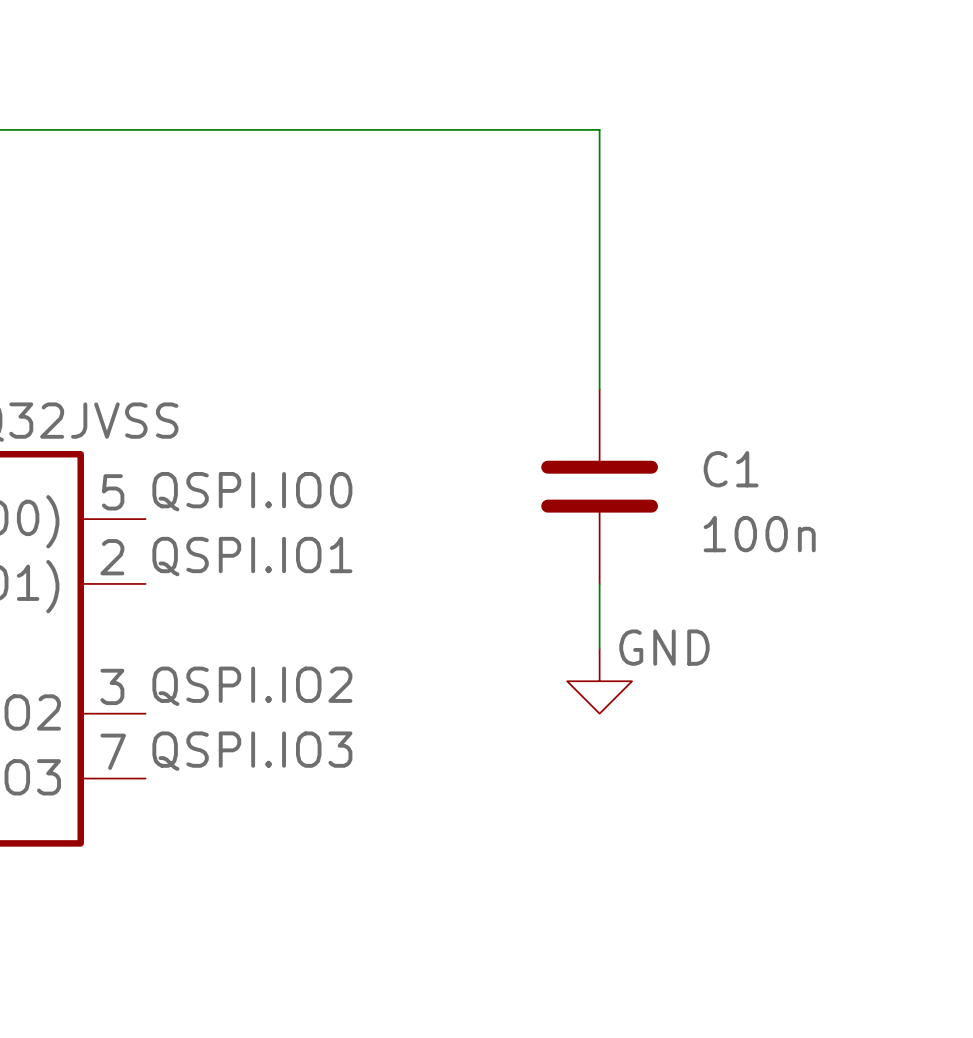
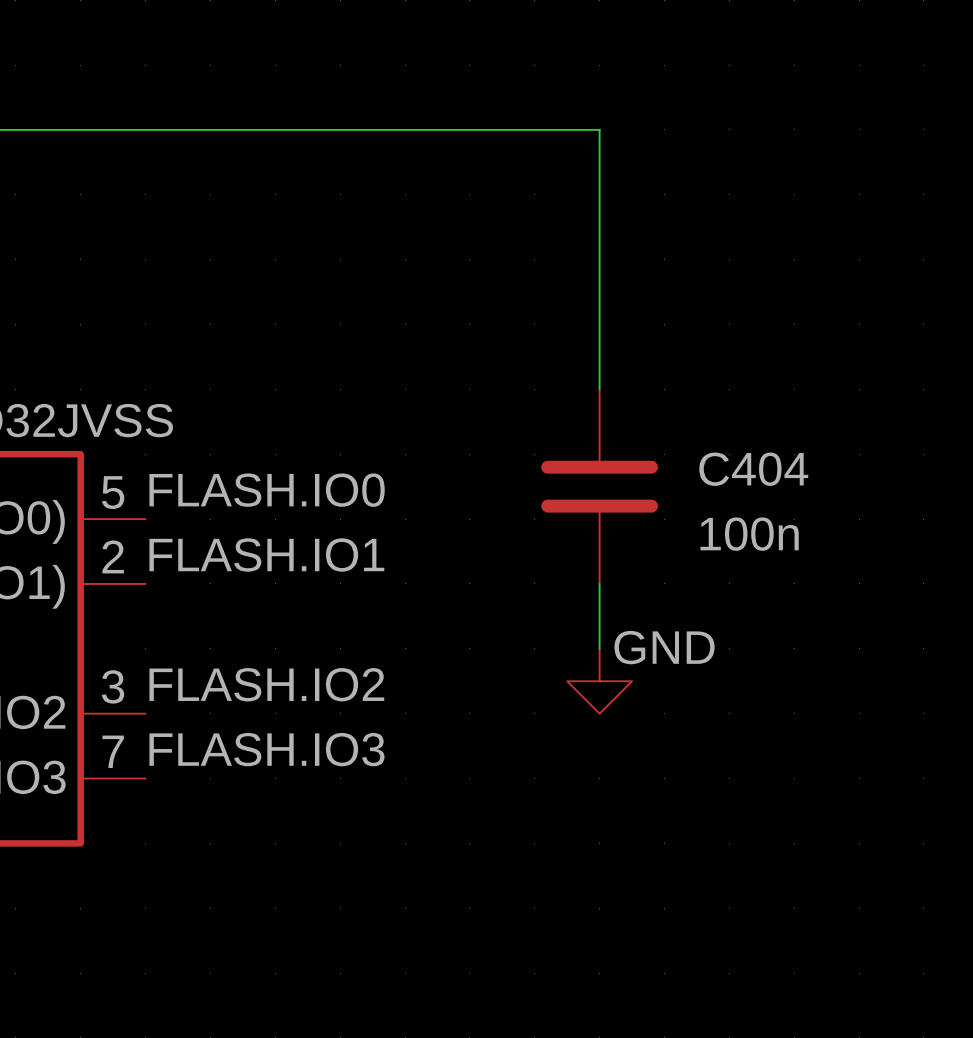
C1 name: C1 (731, 469) -> C404 (753, 469)
label: QSPI.IO0 (252, 491) -> FLASH.IO0 (267, 490)
label: QSPI.IO1 (252, 556) -> FLASH.IO1 (266, 555)
label: QSPI.IO2 (252, 686) -> FLASH.IO2 (266, 684)
label: QSPI.IO3 (252, 751) -> FLASH.IO3 (266, 749)

